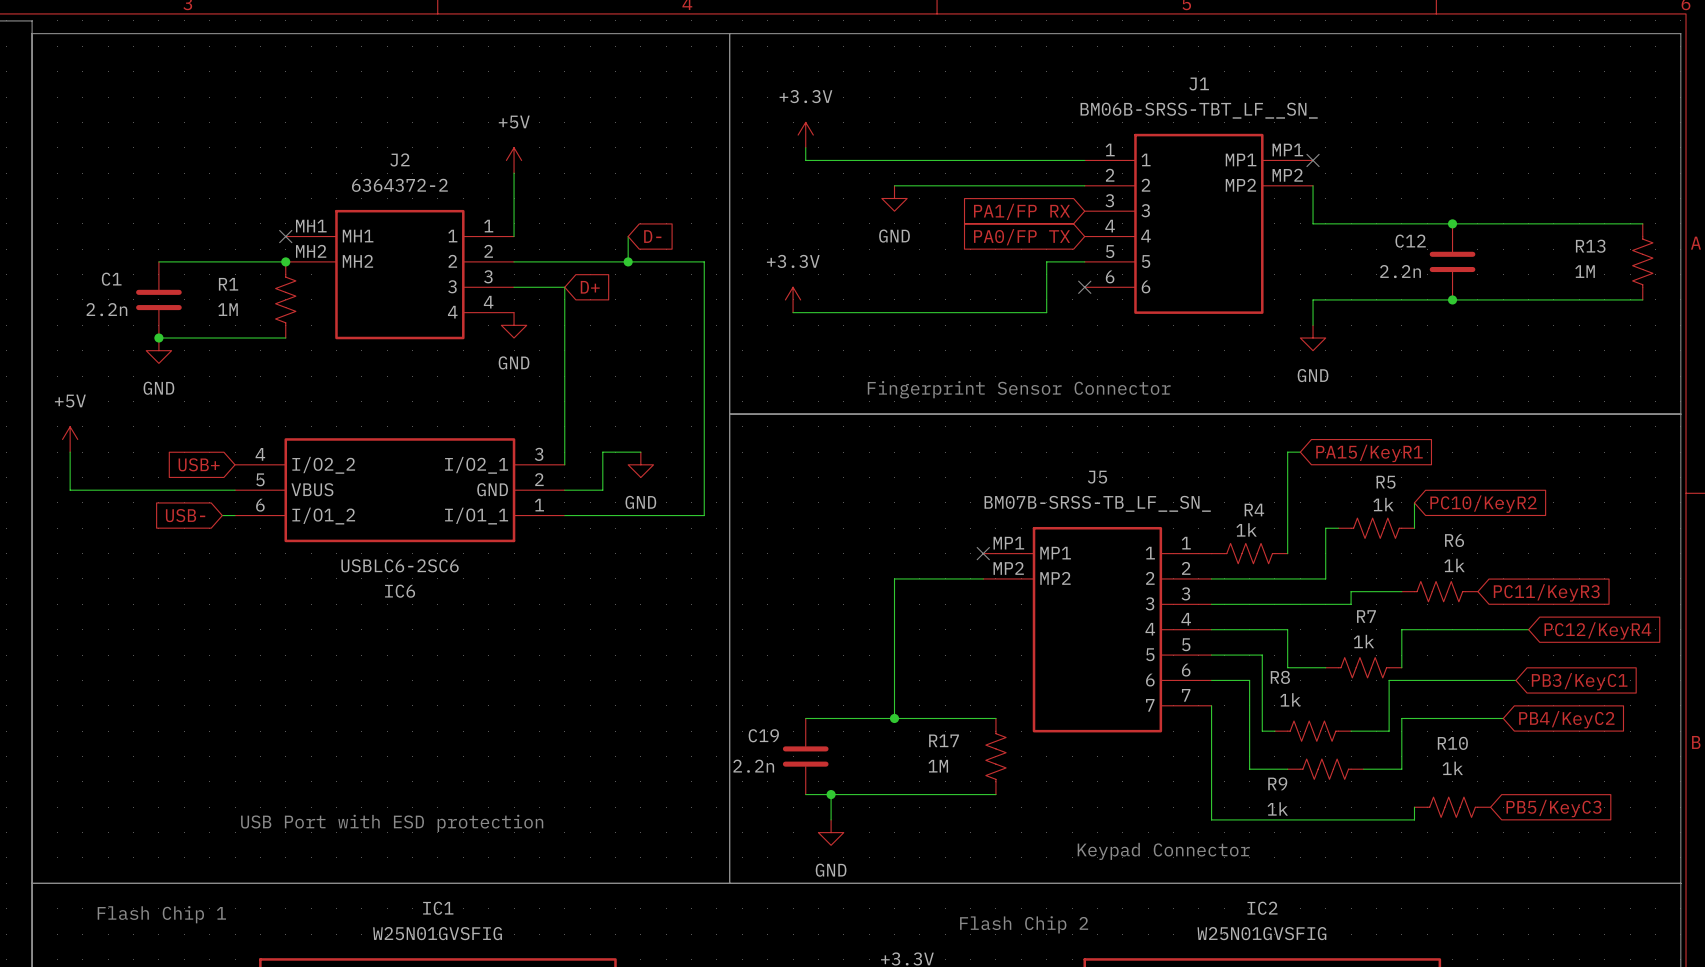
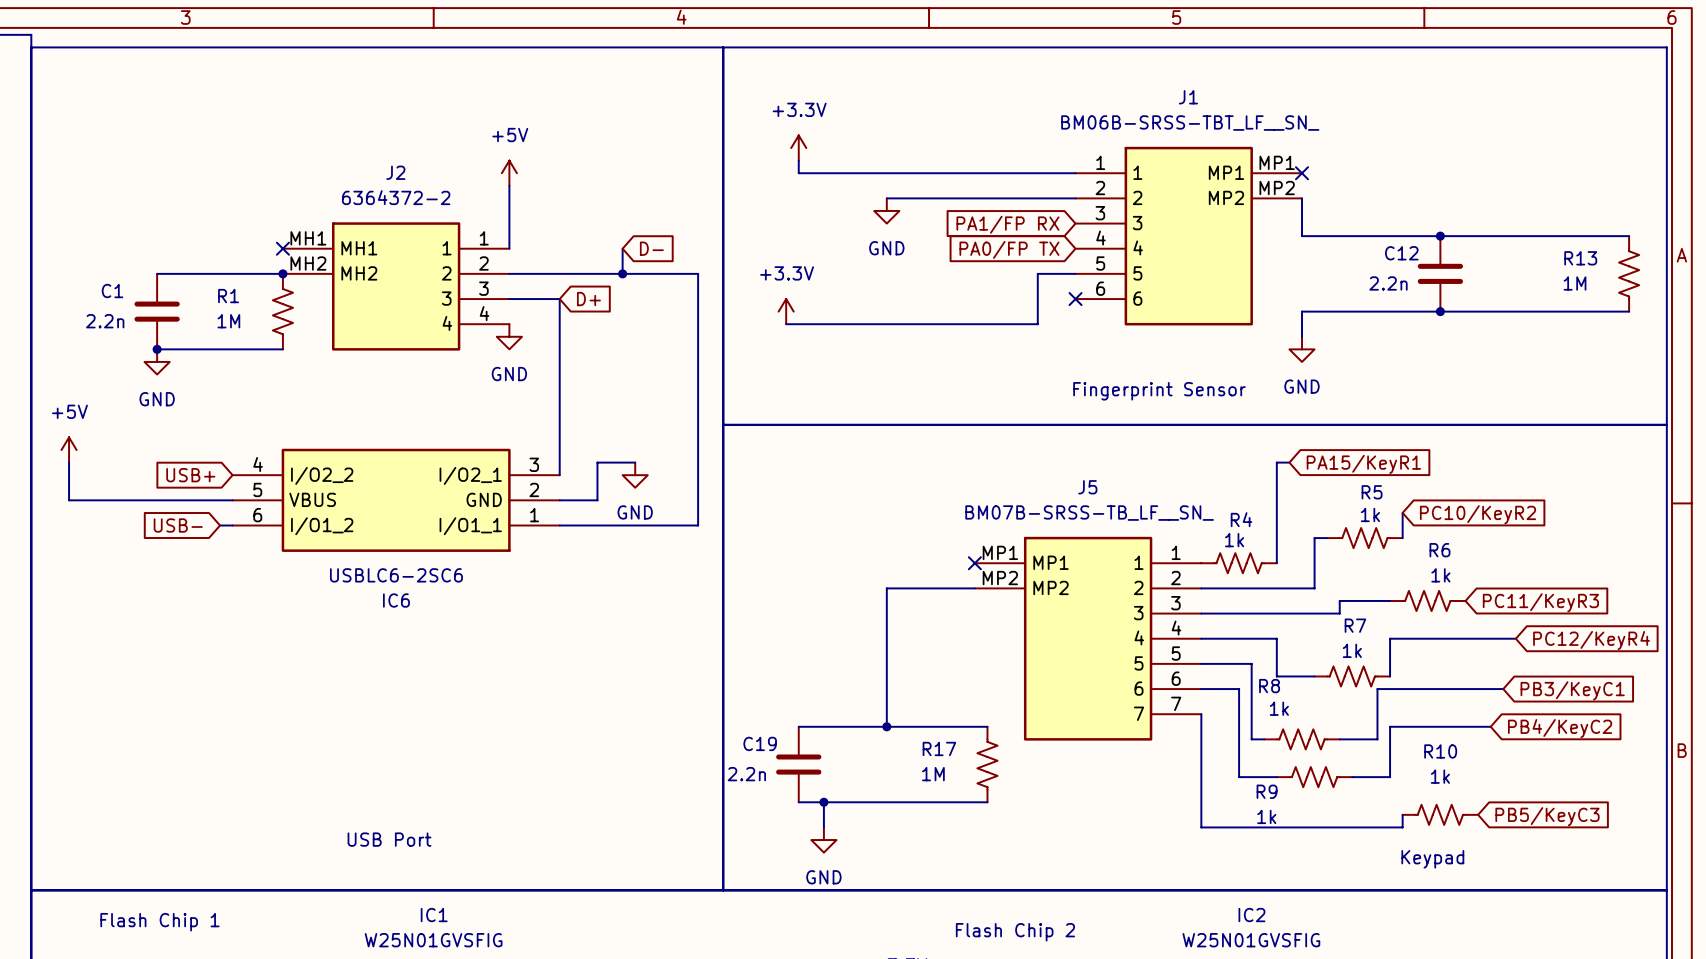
text: Fingerprint Sensor Connector (1019, 389) -> Fingerprint Sensor (1159, 391)
text: USB Port with ESD protection (392, 823) -> none
text: none -> USB Port (389, 839)
text: Keypad Connector (1163, 851) -> none
text: none -> Keypad (1432, 859)

